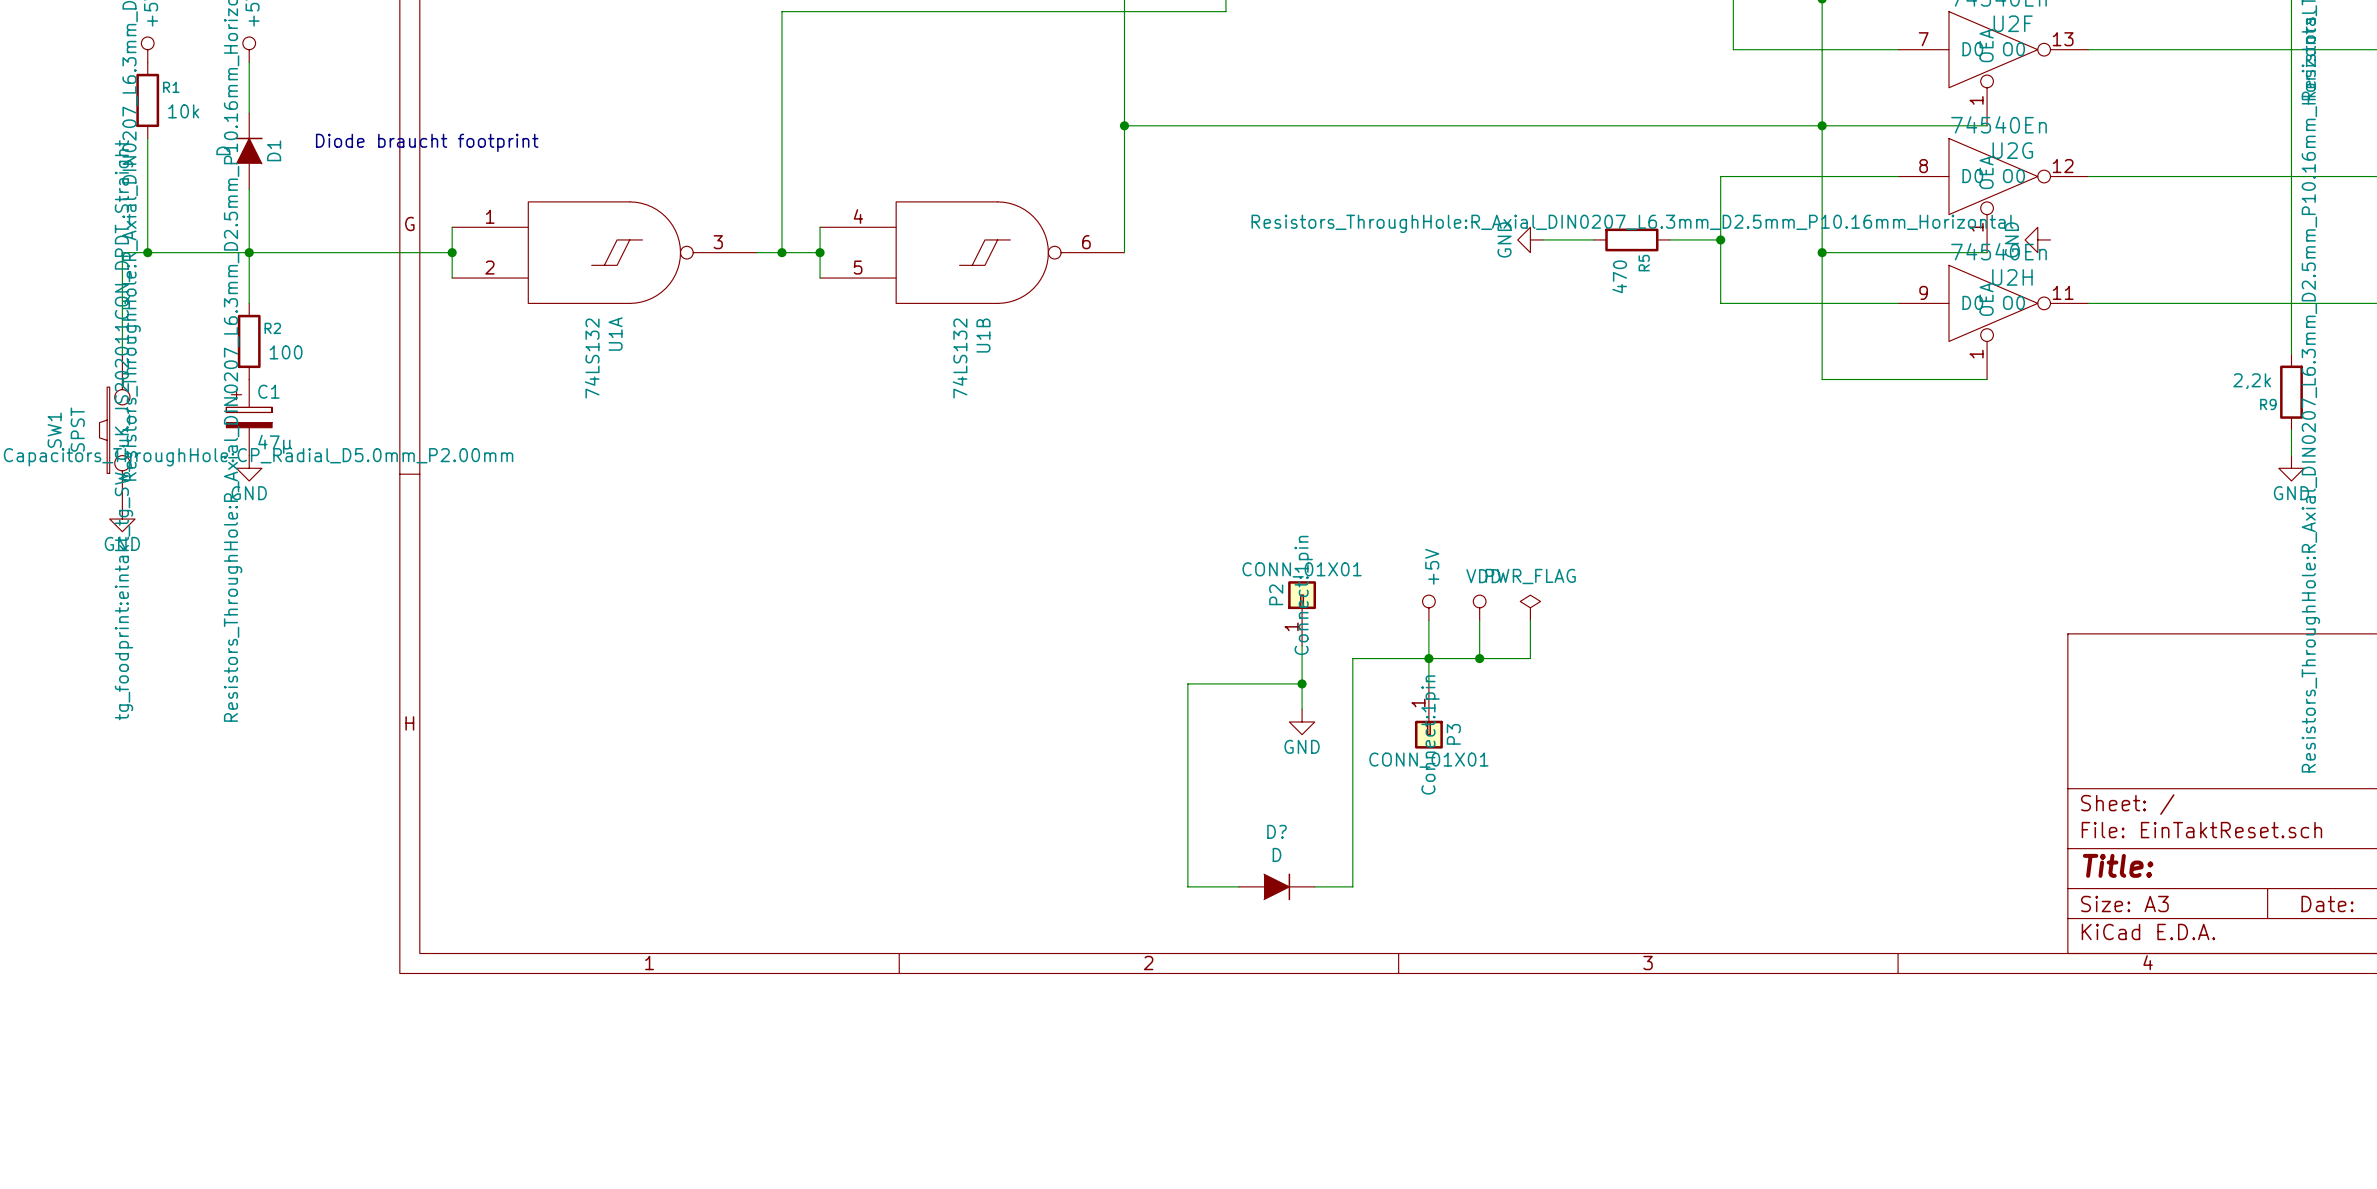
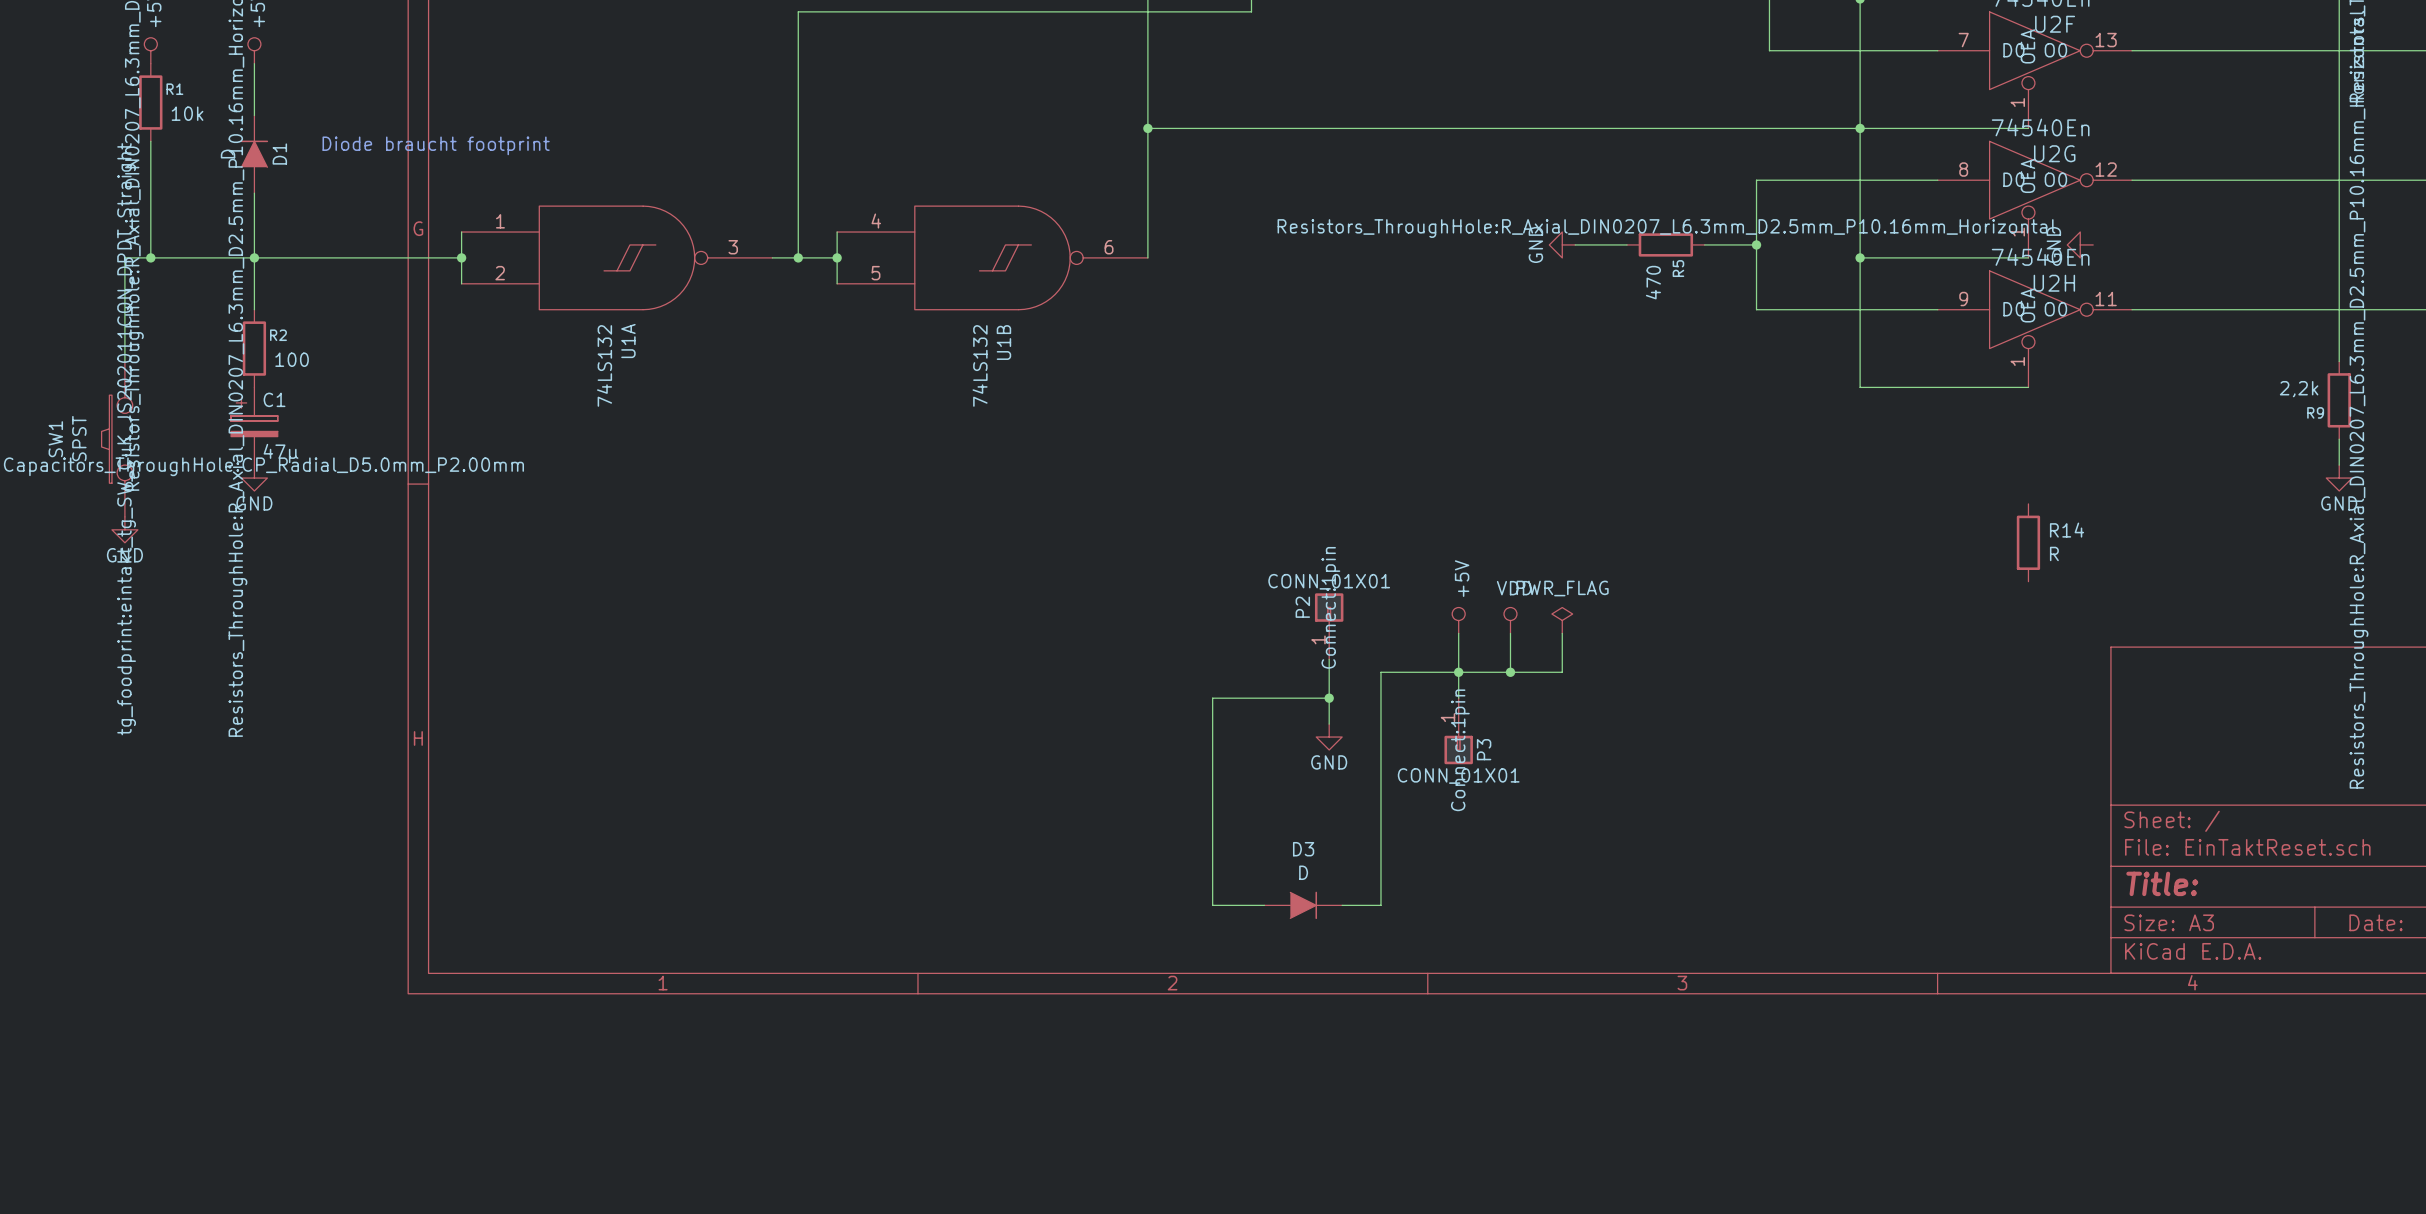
R14: none -> R (2028, 542)
D? name: D? (1277, 831) -> D3 (1303, 849)

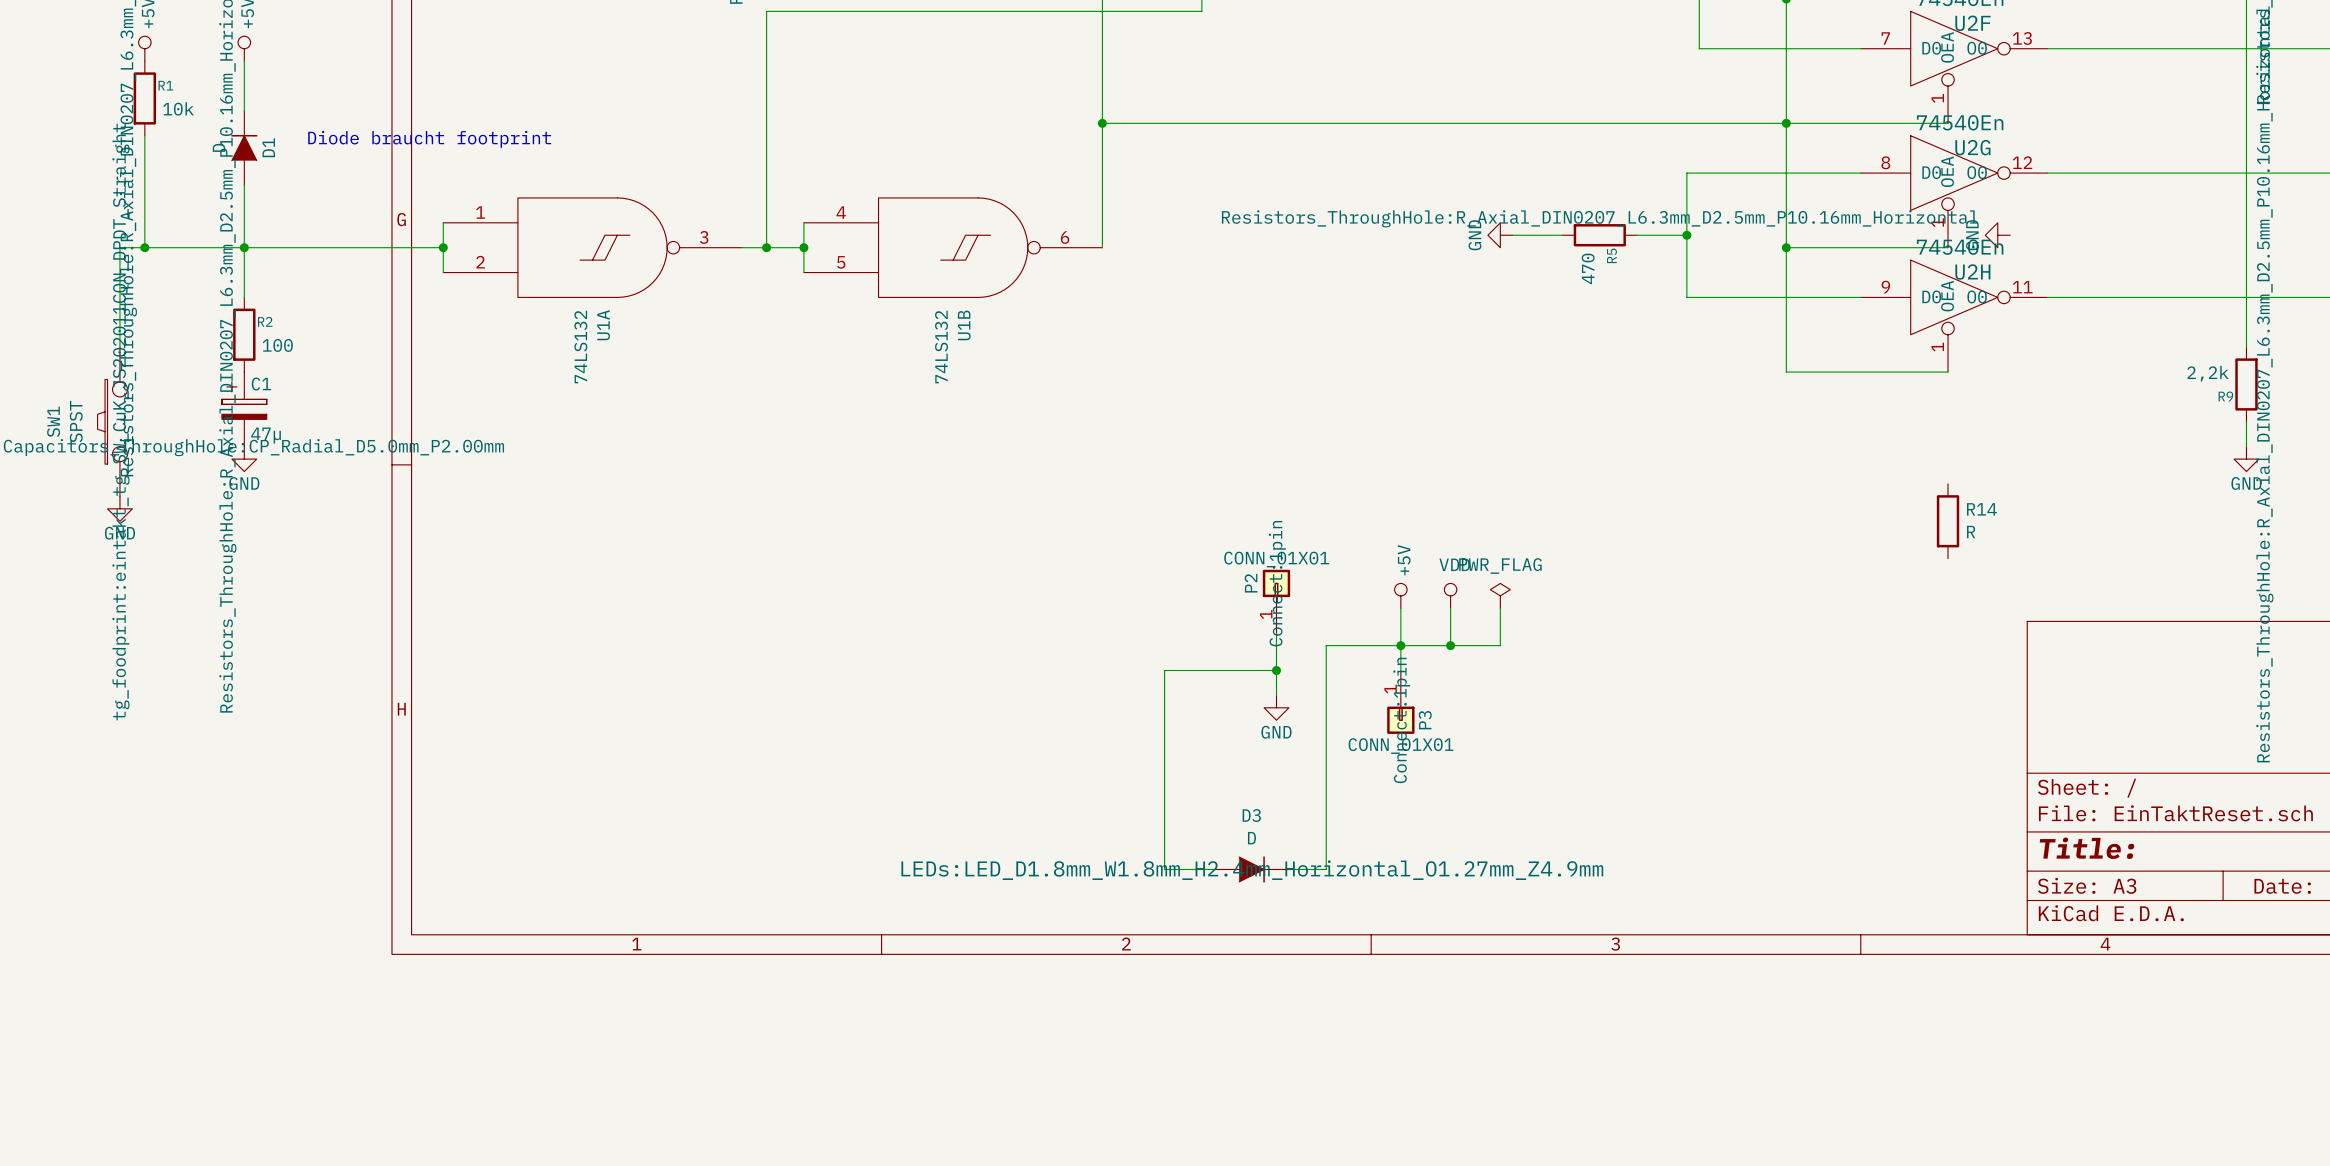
D3 text: none -> LEDs:LED_D1.8mm_W1.8mm_H2.4mm_Horizontal_O1.27mm_Z4.9mm (1252, 870)

